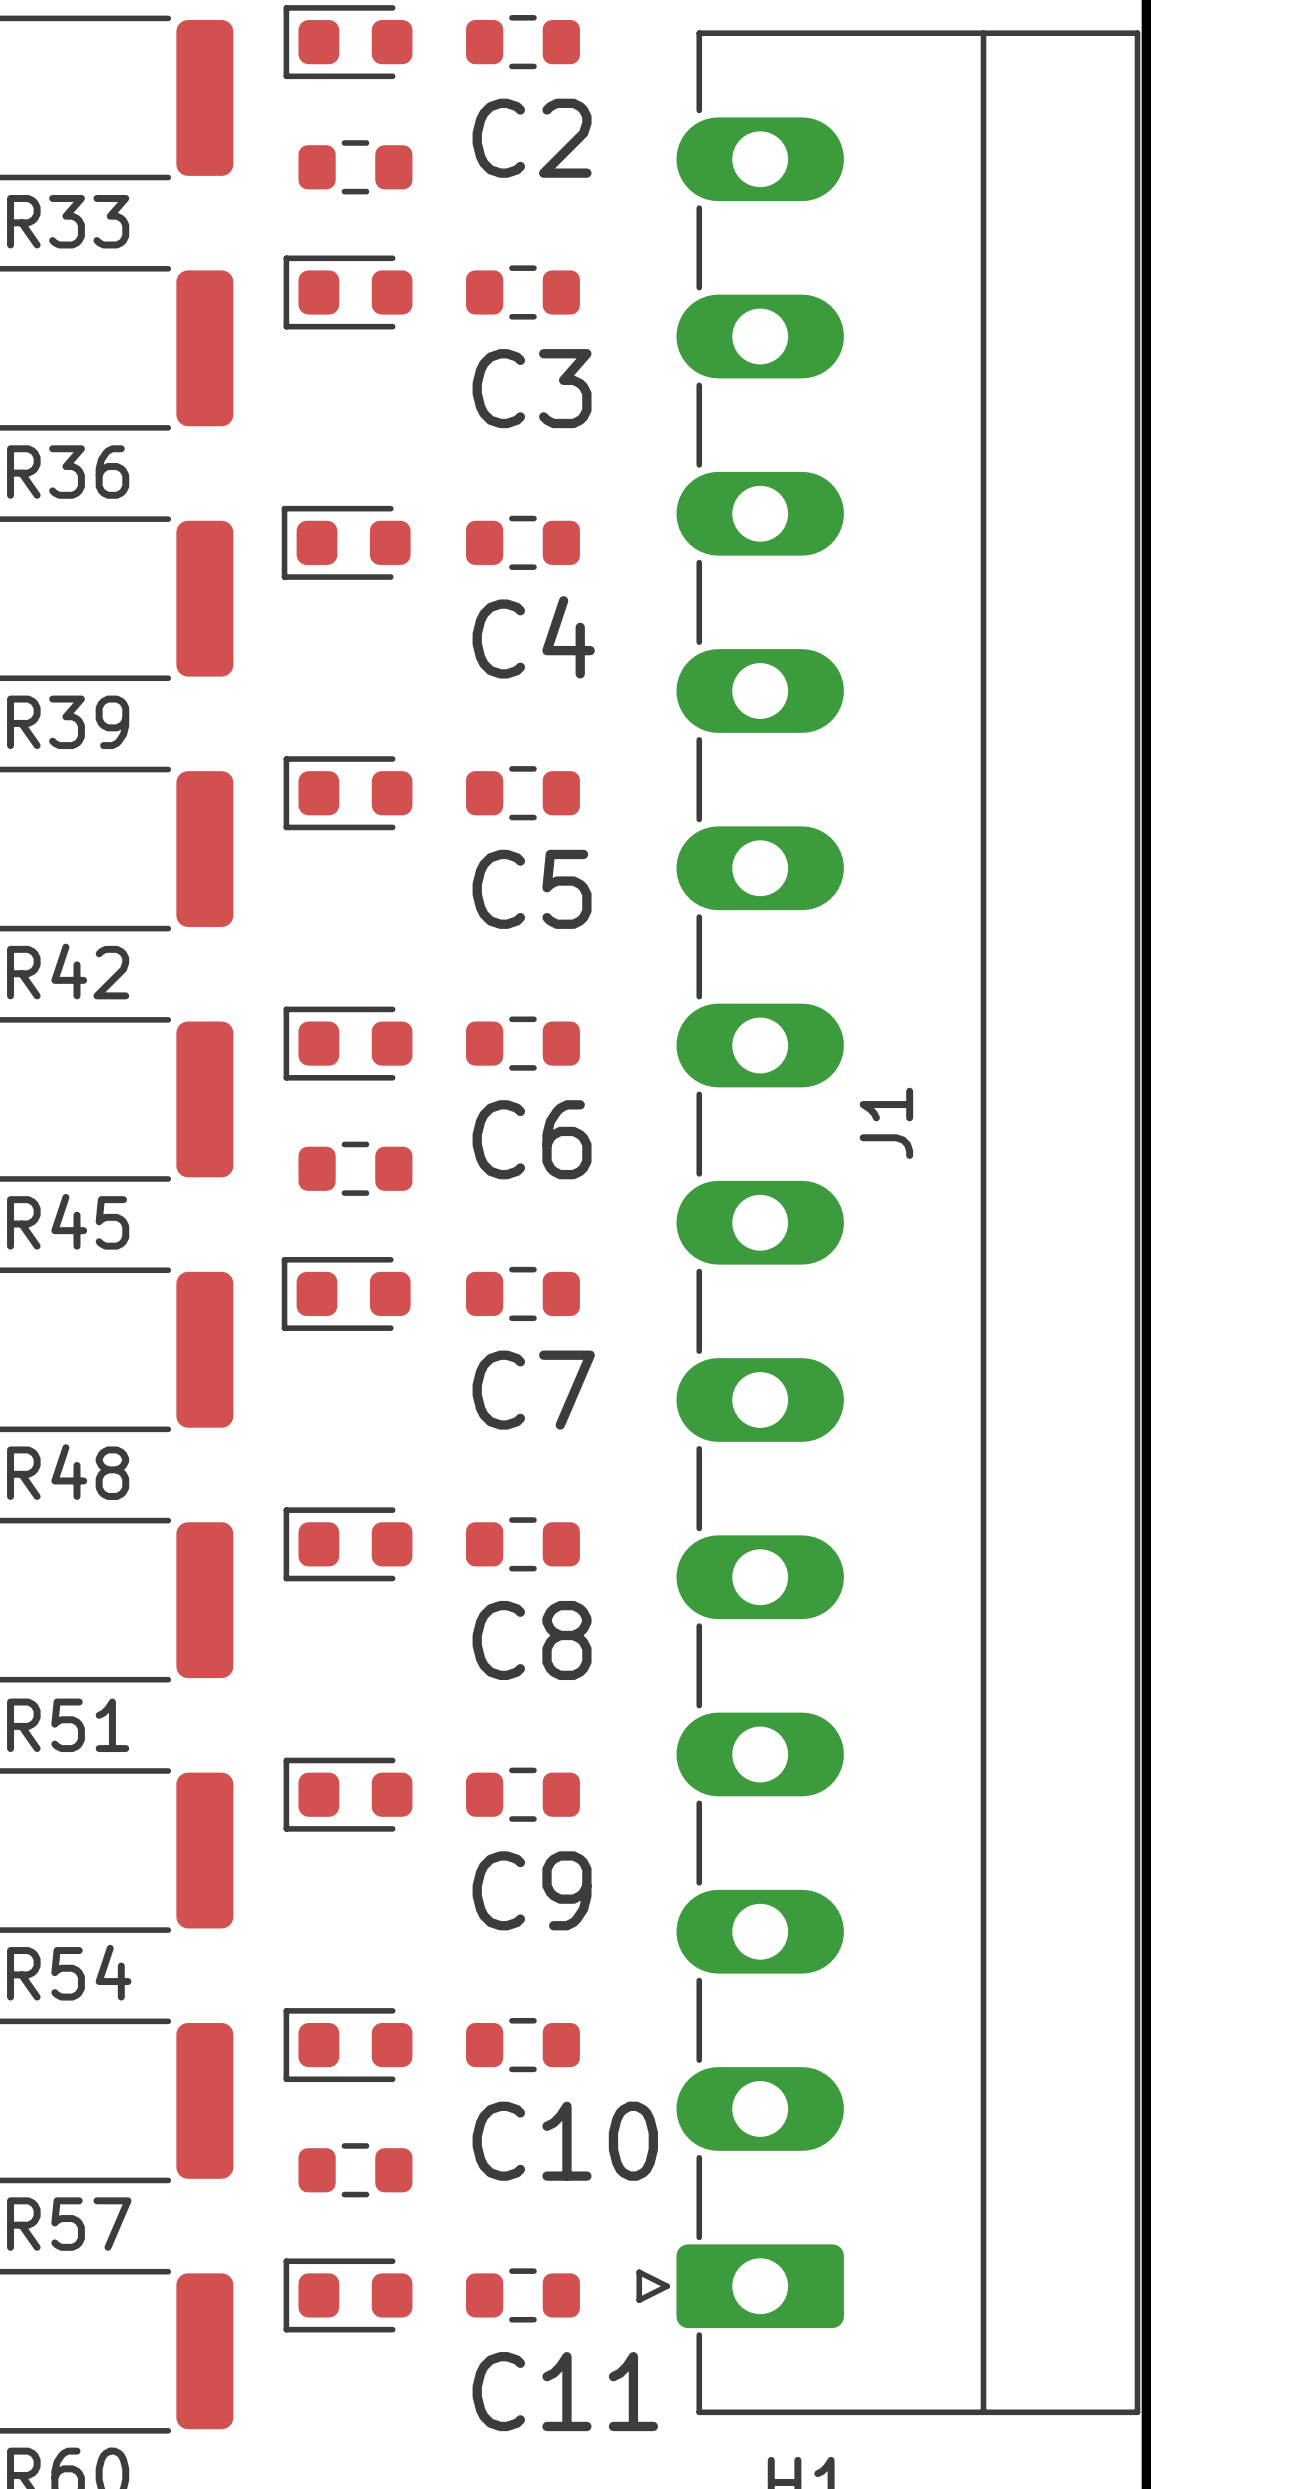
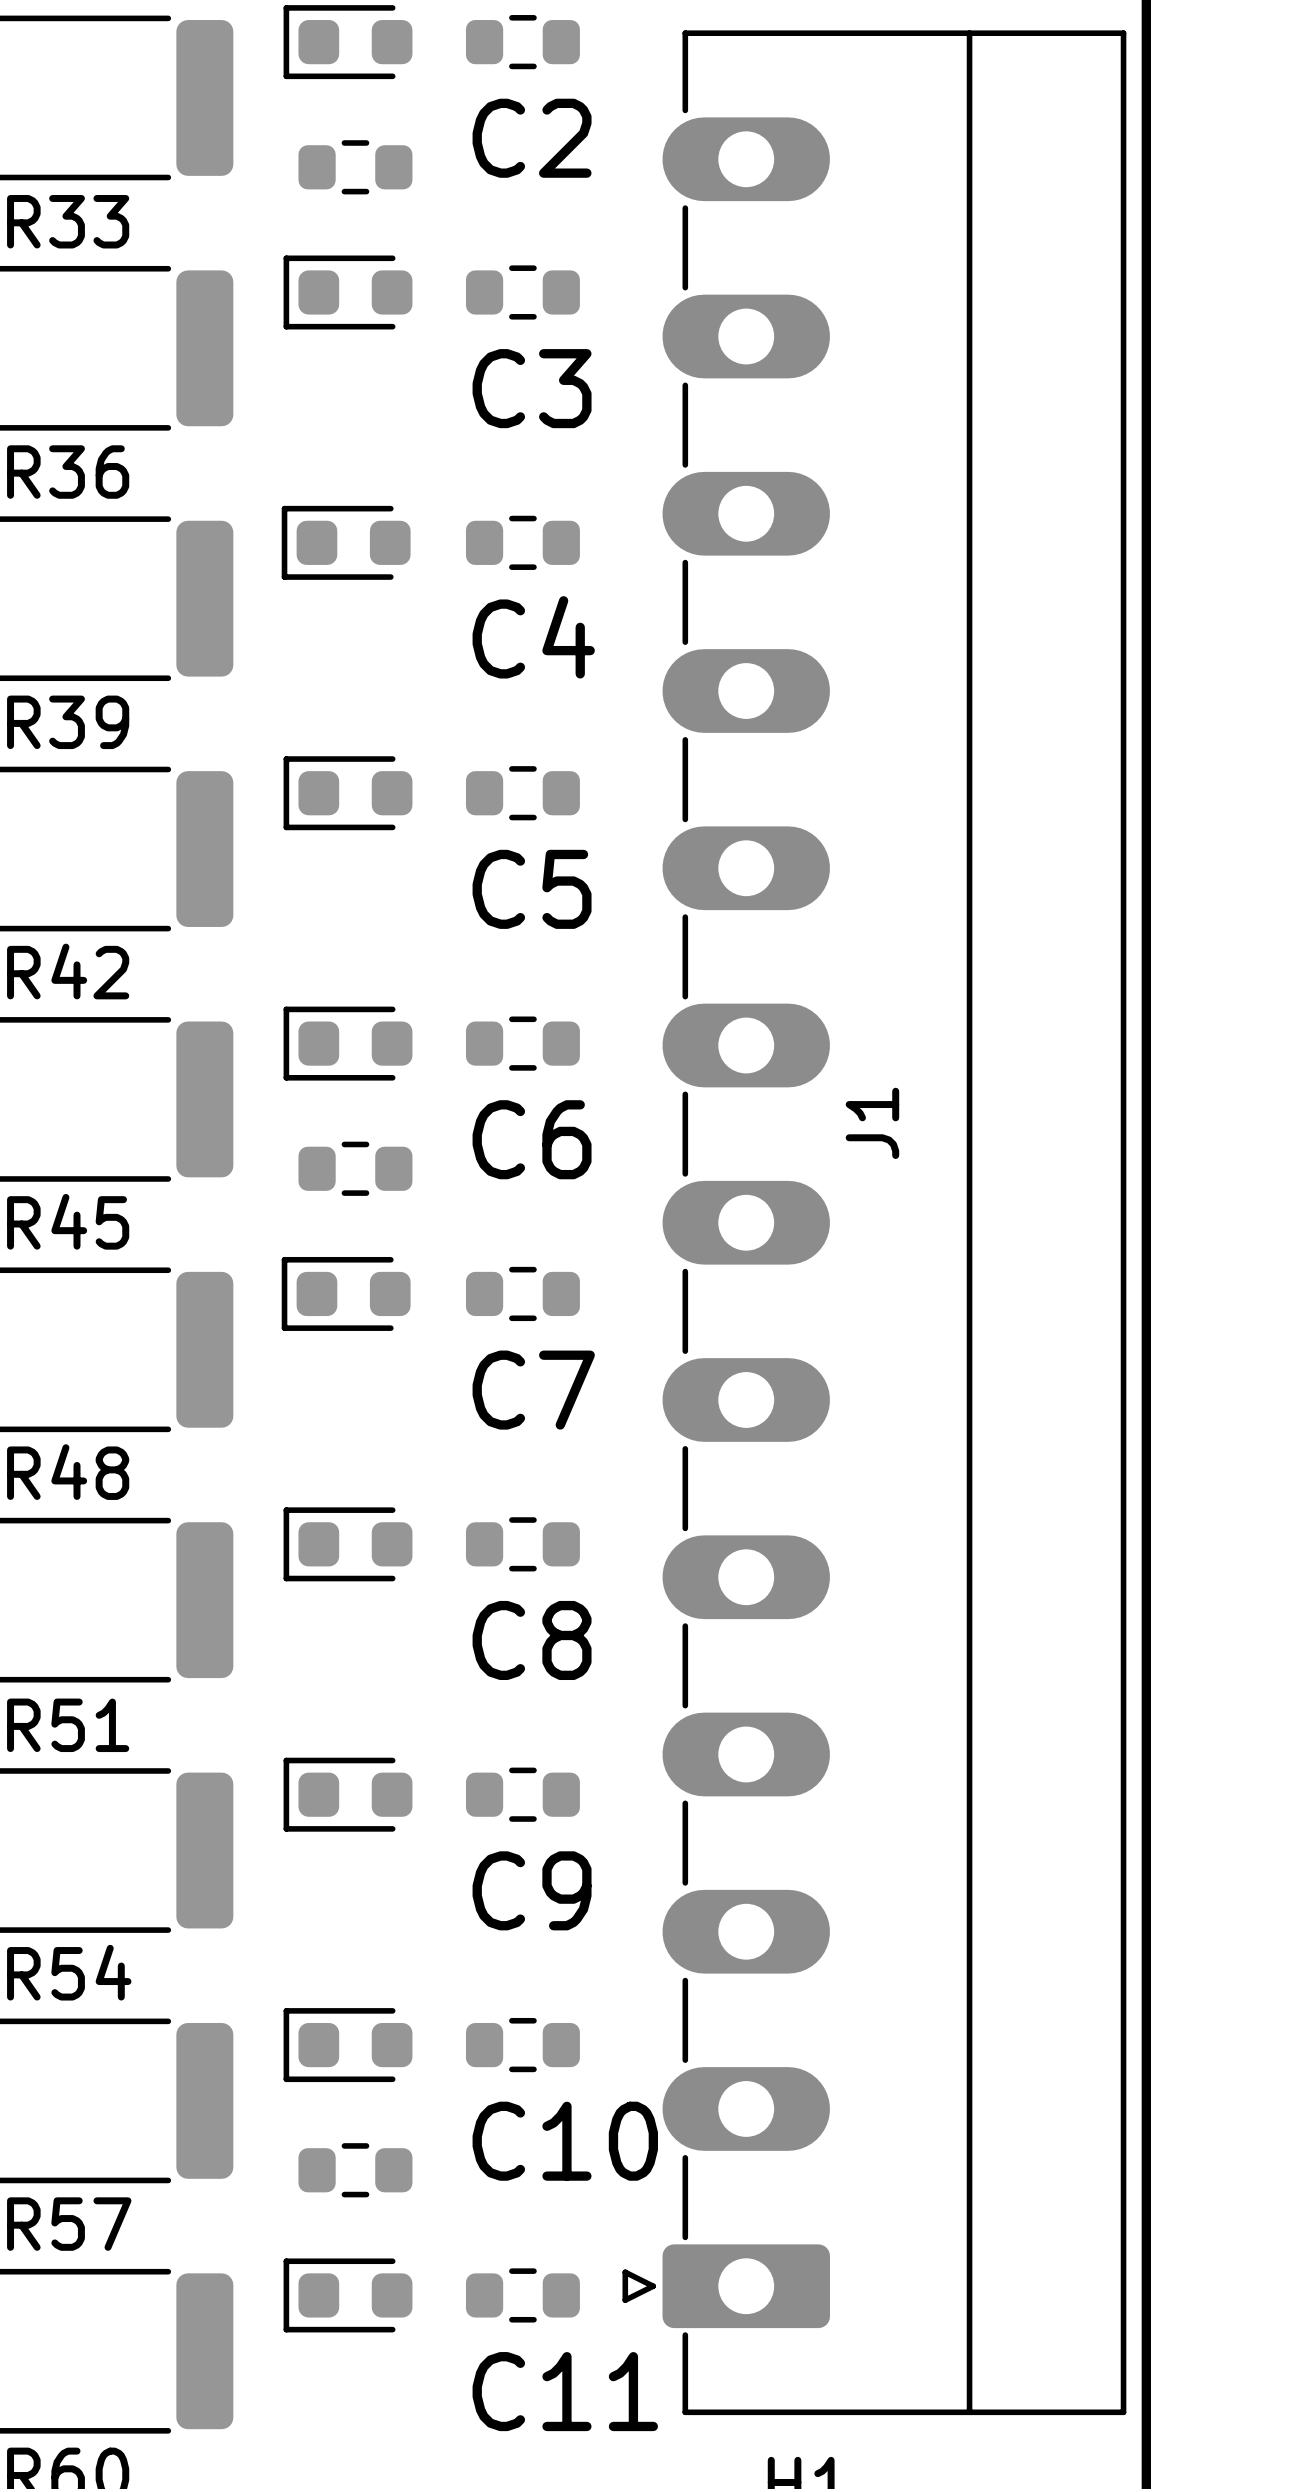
J1 position: (888, 1222) -> (874, 1222)

